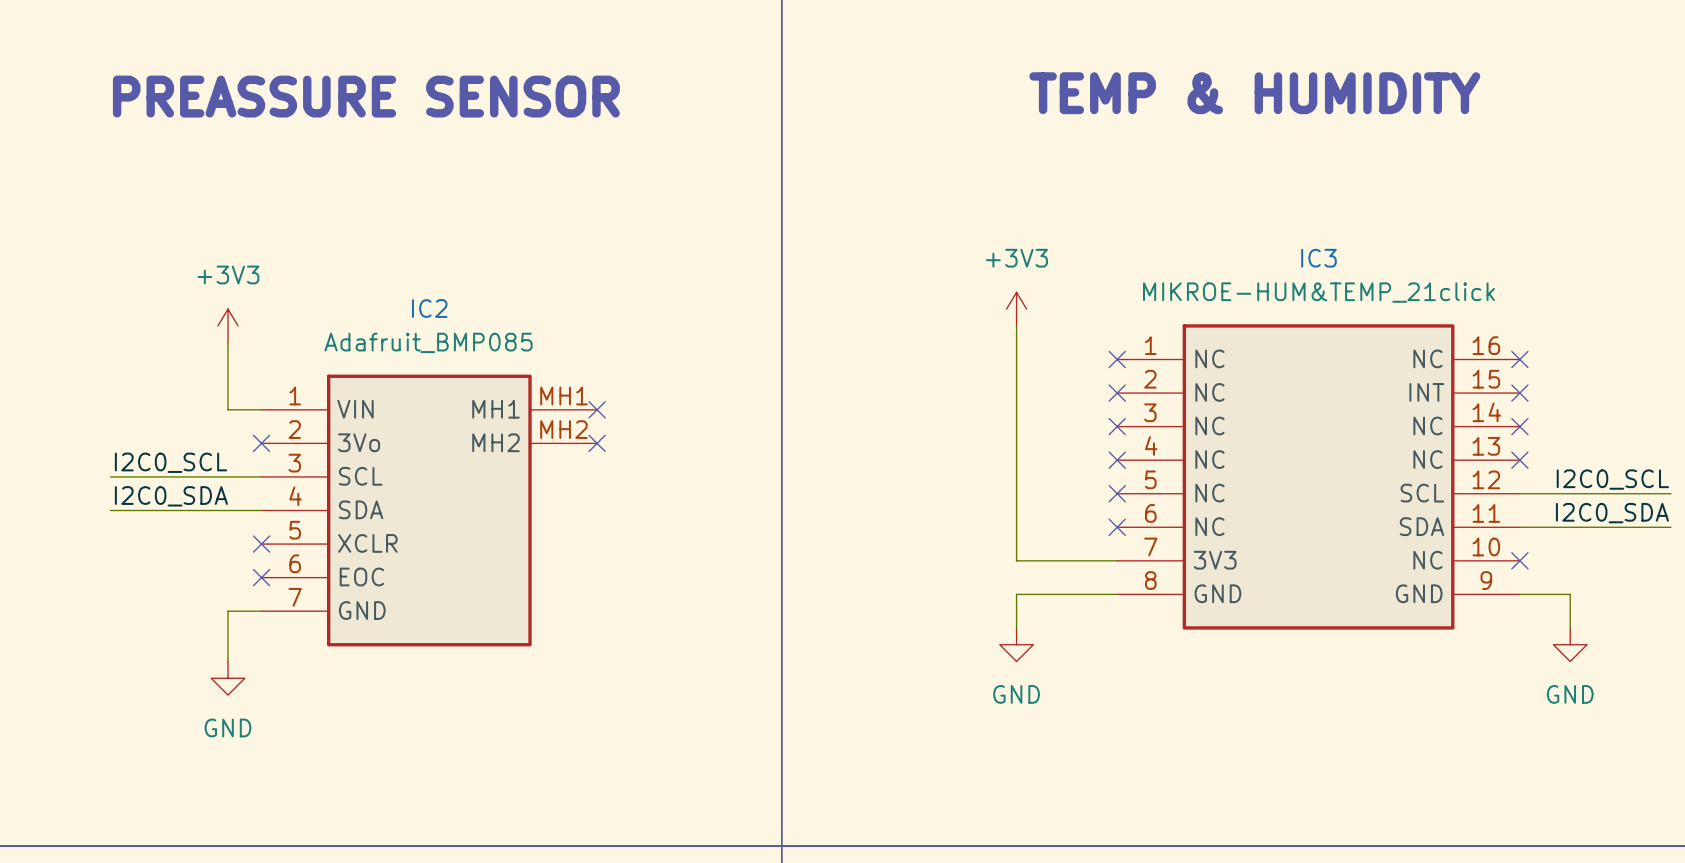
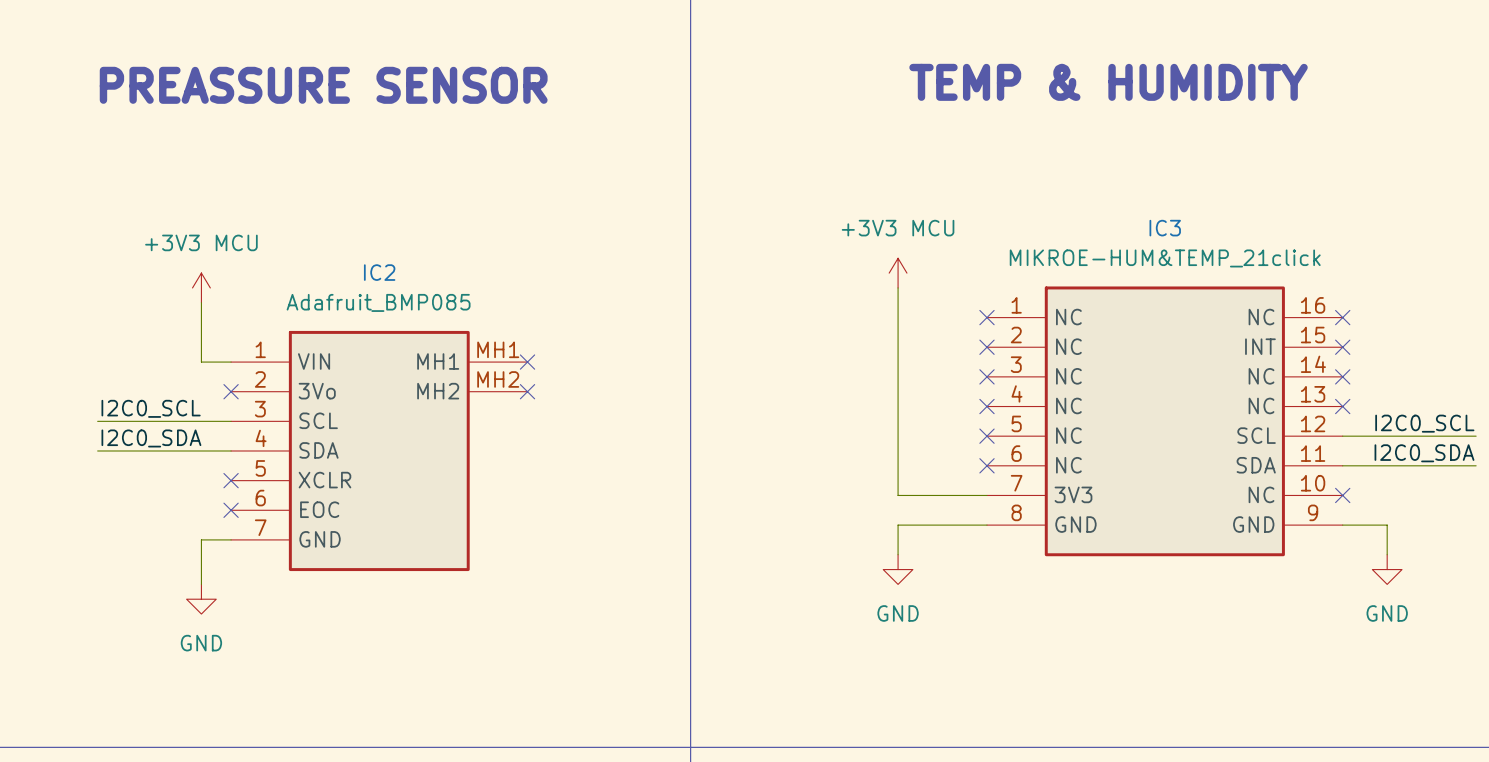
power symbol: +3V3 (1016, 309) -> +3V3 MCU (898, 273)
power symbol: +3V3 (228, 325) -> +3V3 MCU (201, 287)

